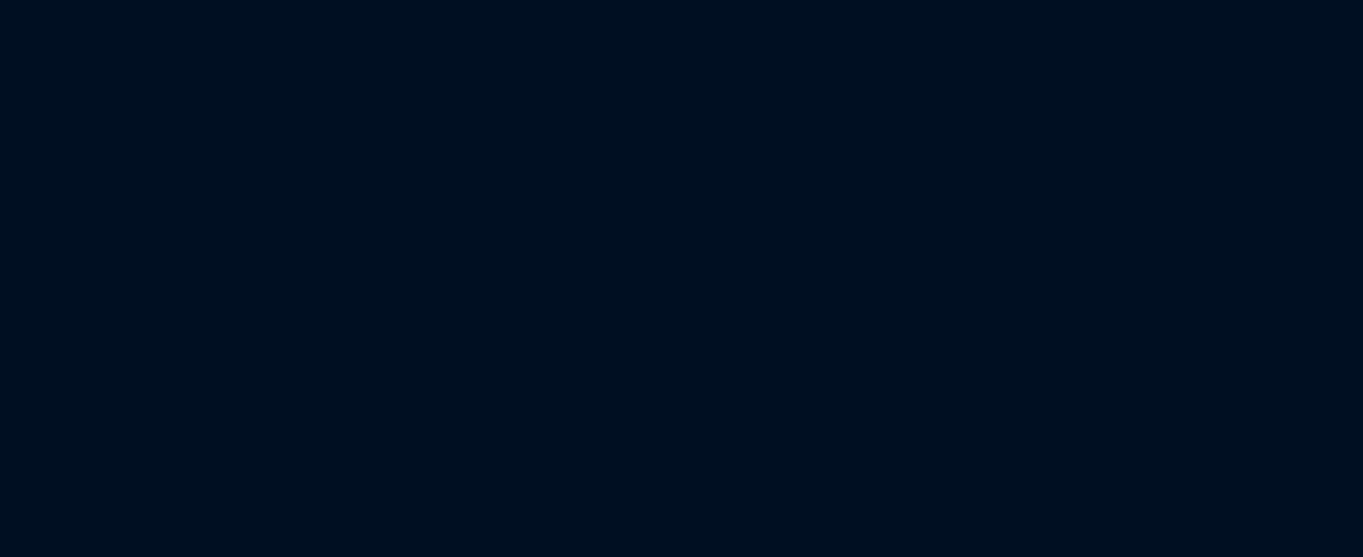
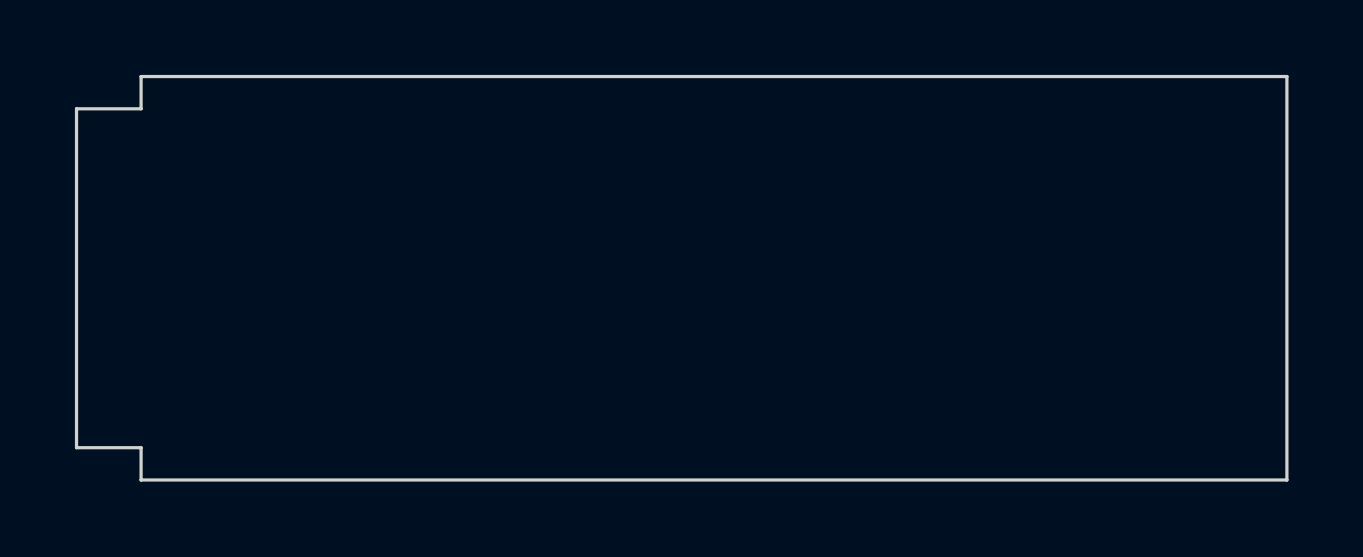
board edge: none -> (1286, 76) (1286, 479) (141, 479) (141, 447) (76, 447) (76, 108) (141, 108) (141, 76) (1286, 76)

